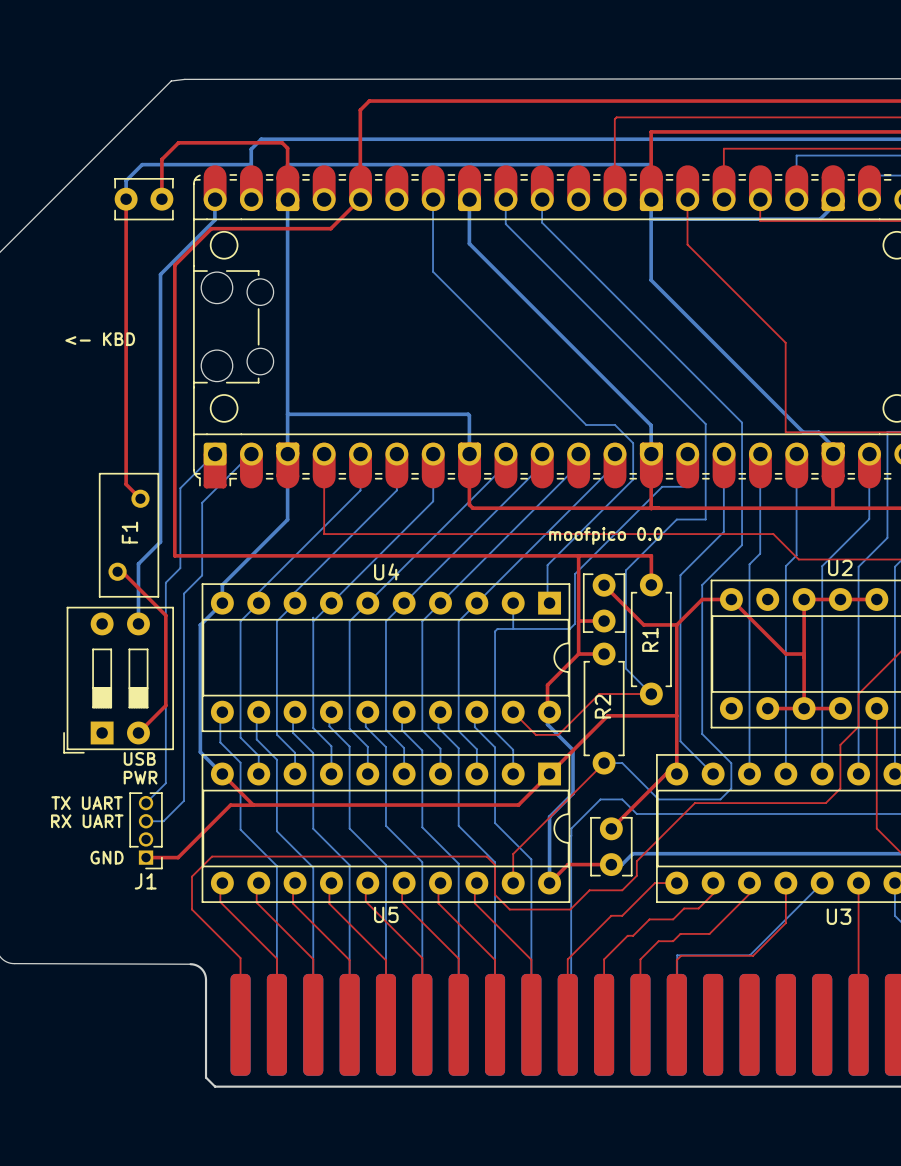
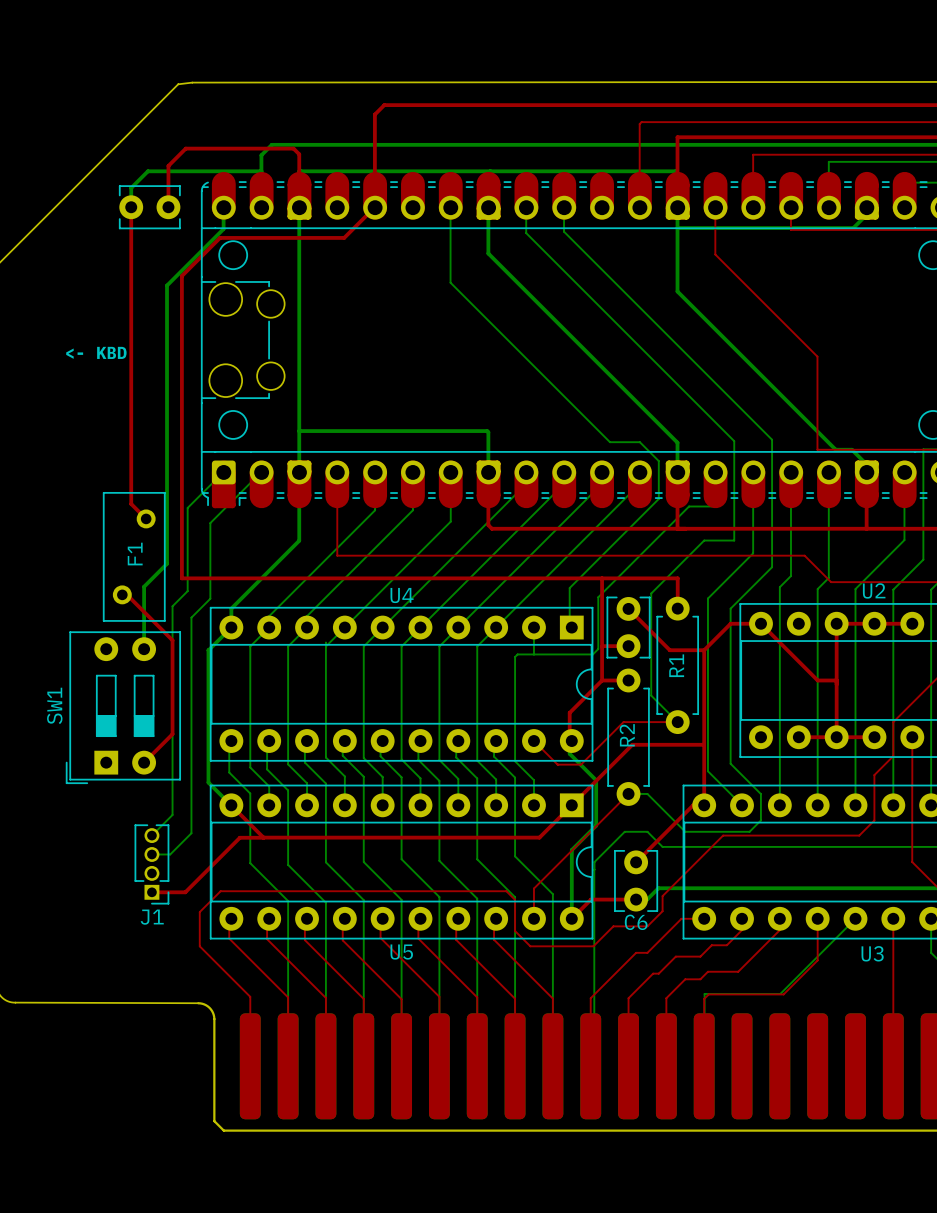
text: moofpico 0.0 (605, 536) -> none
SW1 name: none -> SW1 (54, 705)
text: USB (139, 758) -> none
text: PWR (140, 777) -> none
text: TX UART (87, 803) -> none
text: RX UART (87, 821) -> none
text: GND (107, 857) -> none
C6 name: none -> C6 (636, 922)

